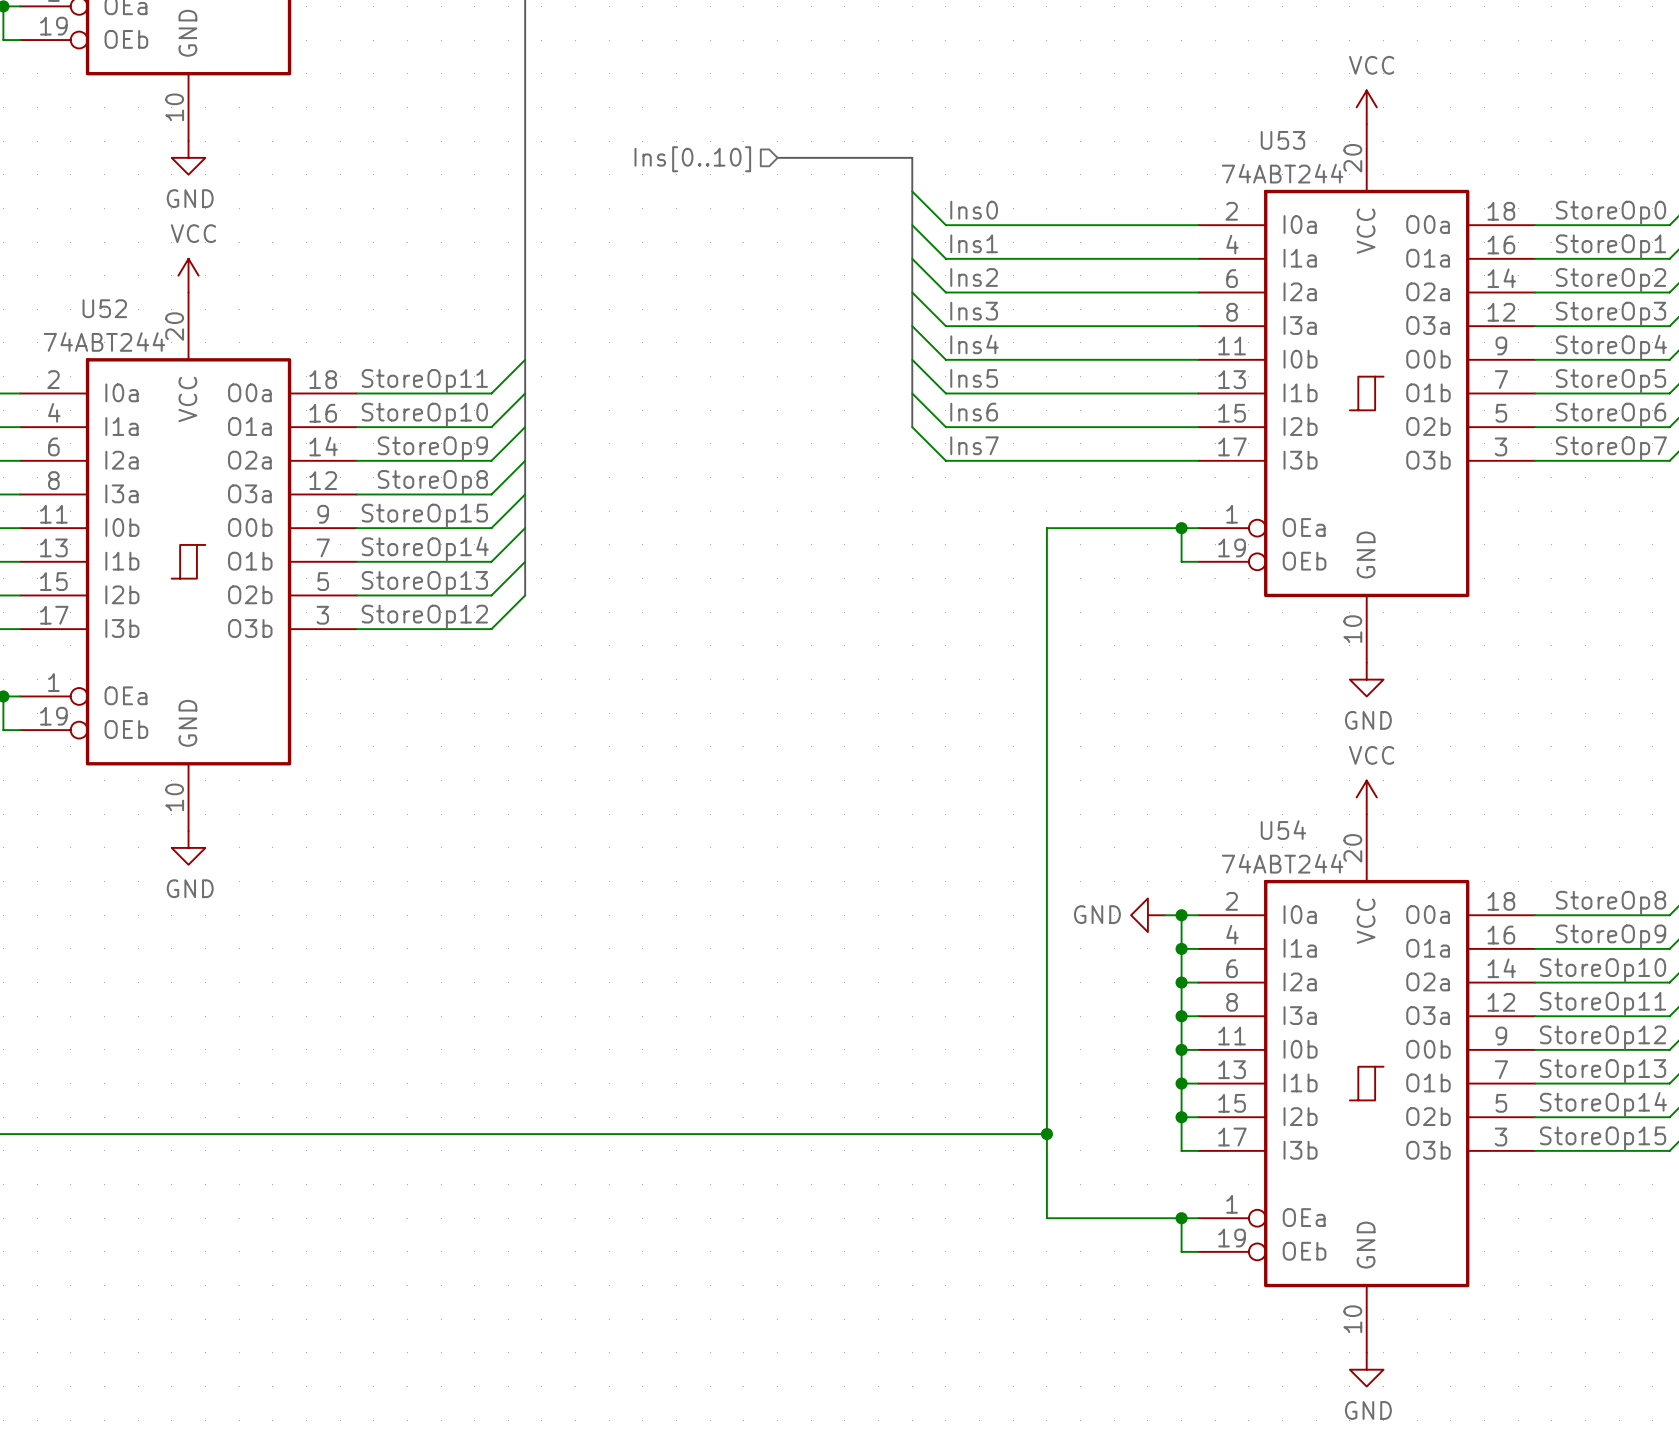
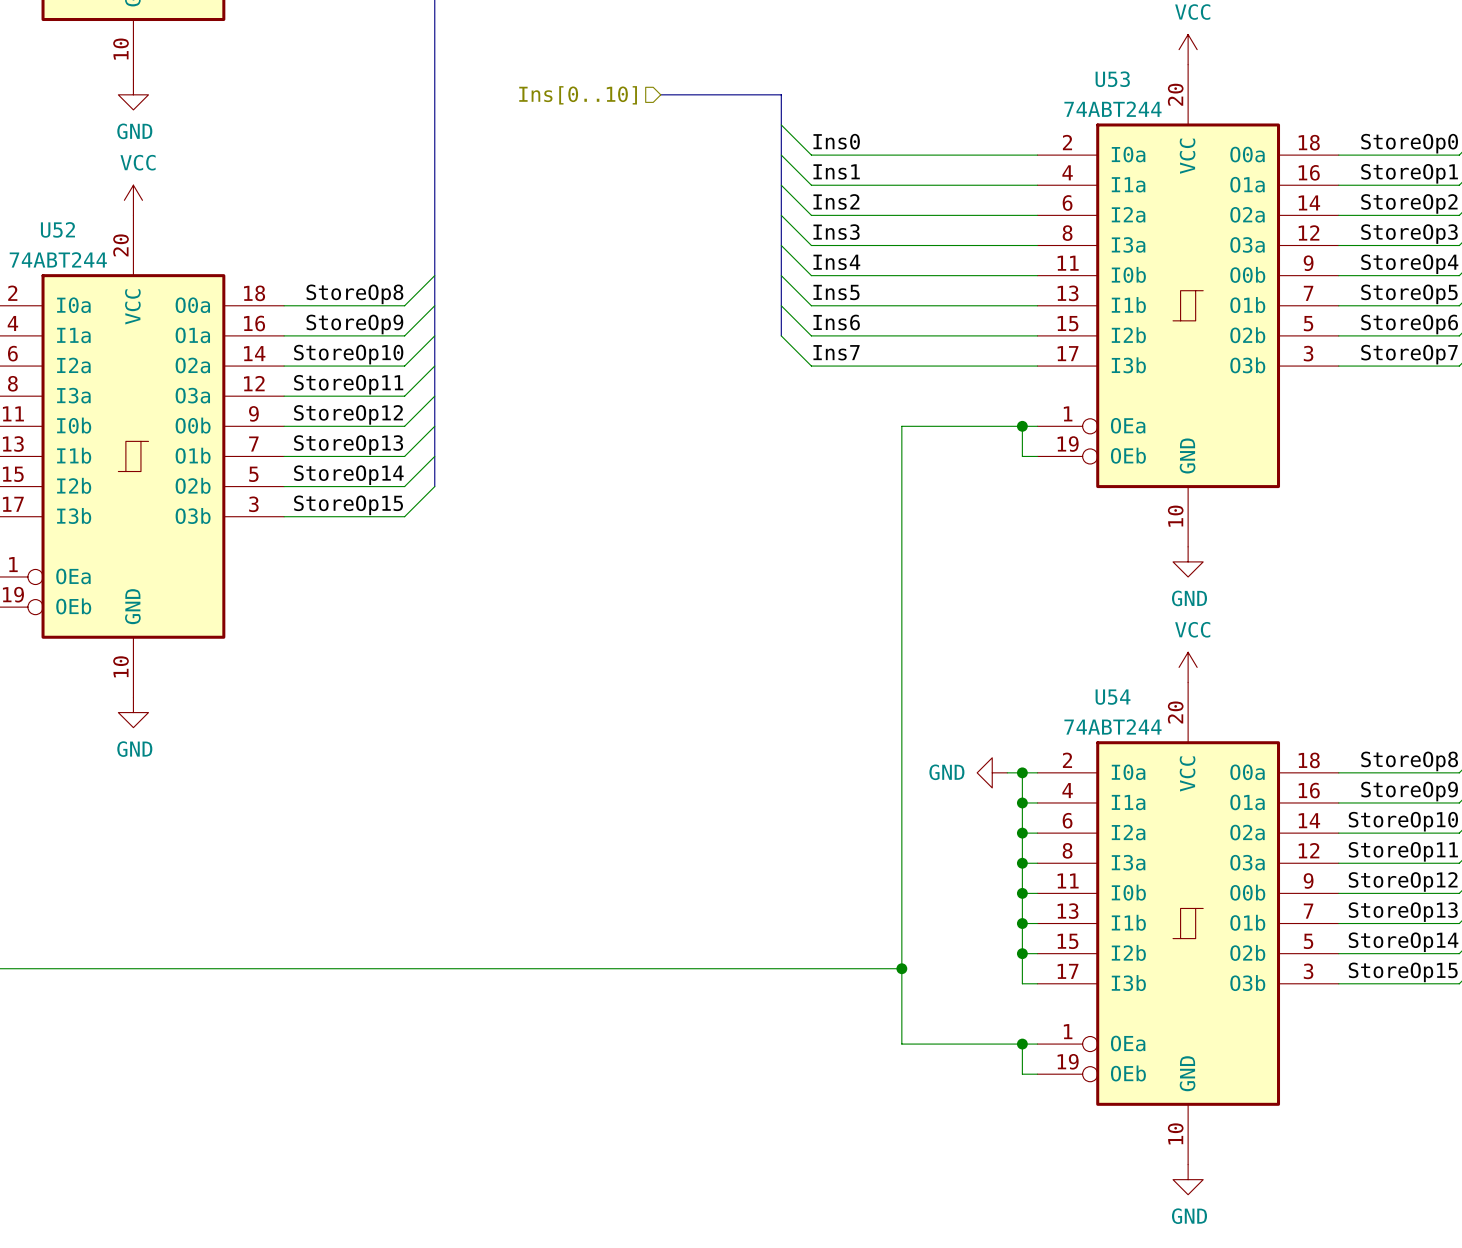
label: StoreOp11 (424, 381) -> StoreOp8 (354, 294)
label: StoreOp10 (424, 414) -> StoreOp9 (354, 324)
label: StoreOp9 (432, 448) -> StoreOp10 (348, 354)
label: StoreOp8 (432, 482) -> StoreOp11 (348, 384)
label: StoreOp15 (424, 515) -> StoreOp12 (348, 414)
label: StoreOp14 (425, 549) -> StoreOp13 (348, 445)
label: StoreOp13 (424, 583) -> StoreOp14 (348, 475)
label: StoreOp12 (424, 616) -> StoreOp15 (348, 505)

